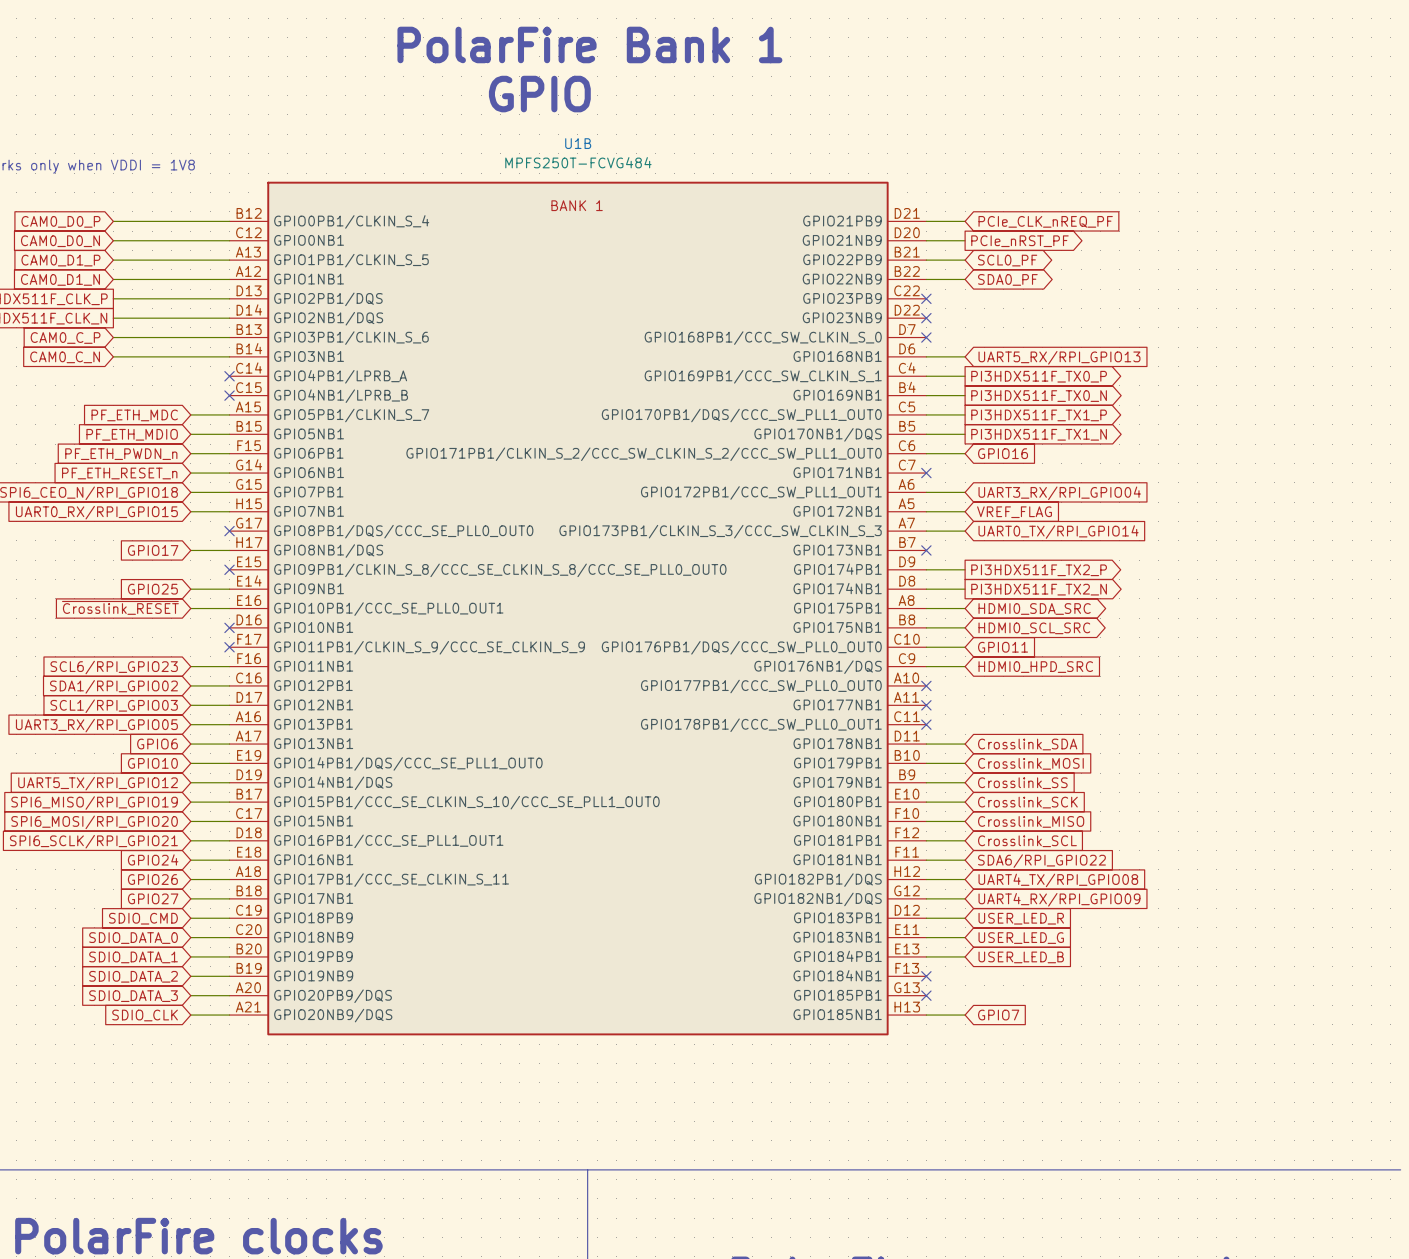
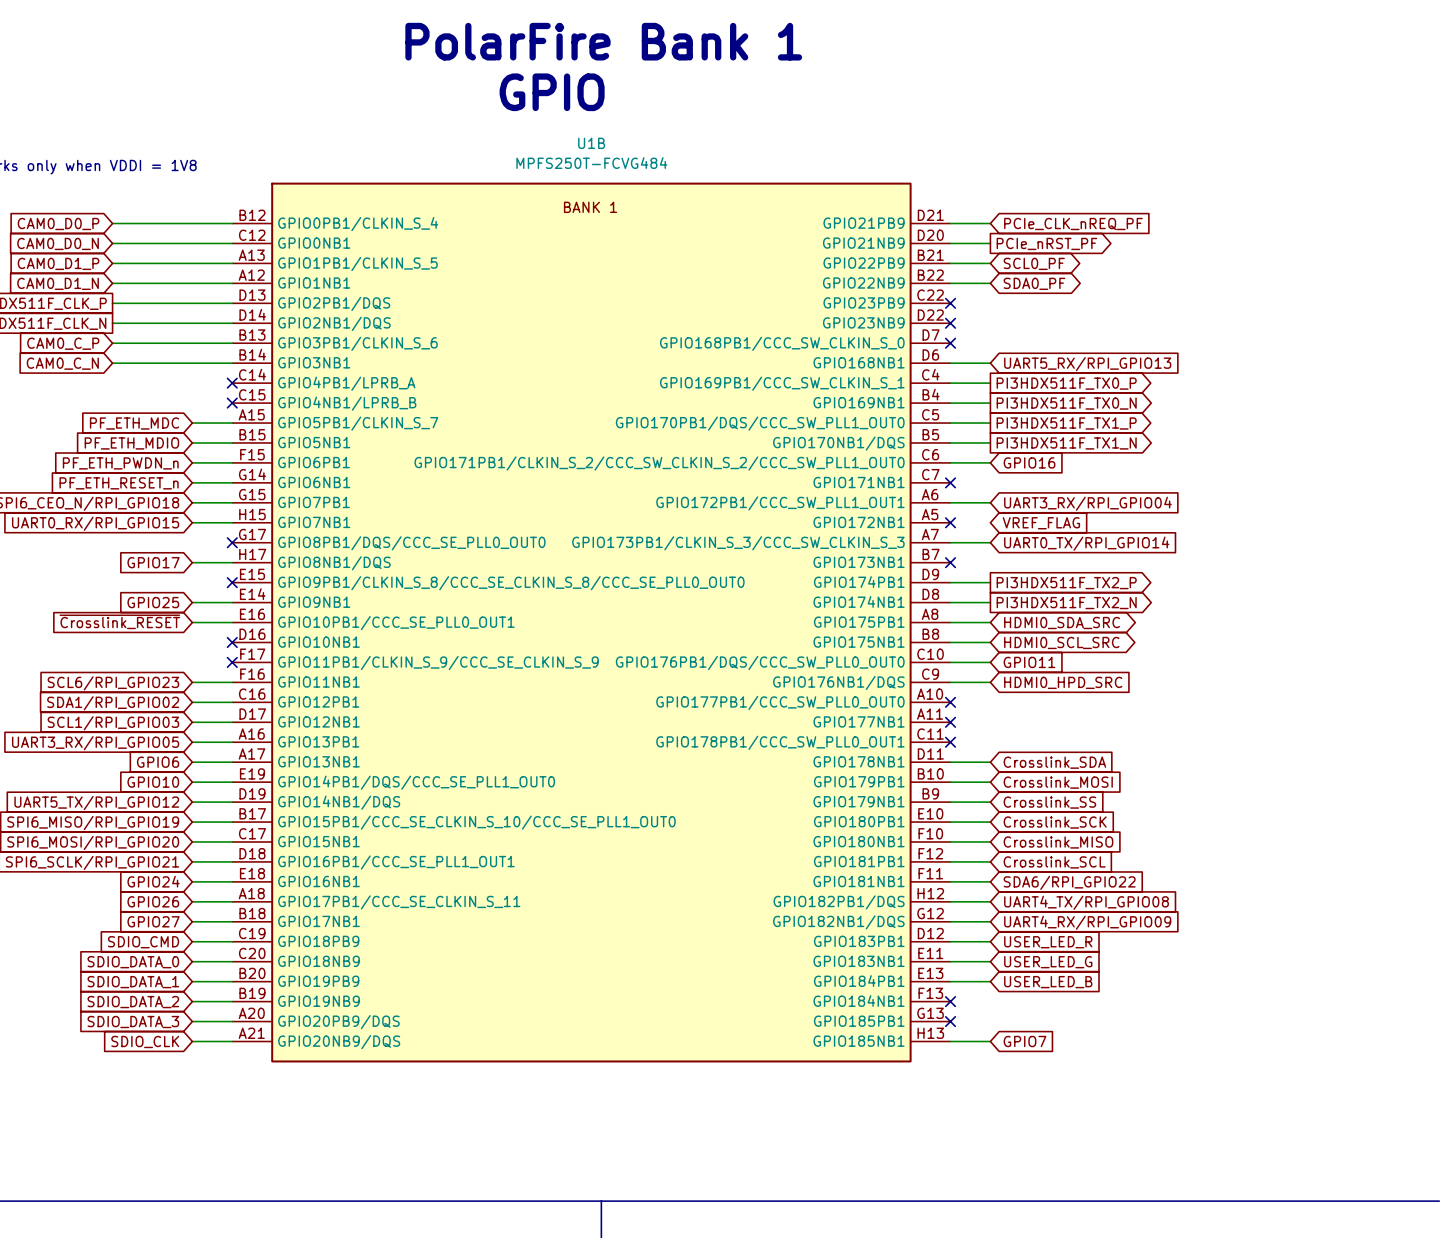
wire: (926, 511) (965, 511) -> none
no-connect mark: none -> (950, 522)

